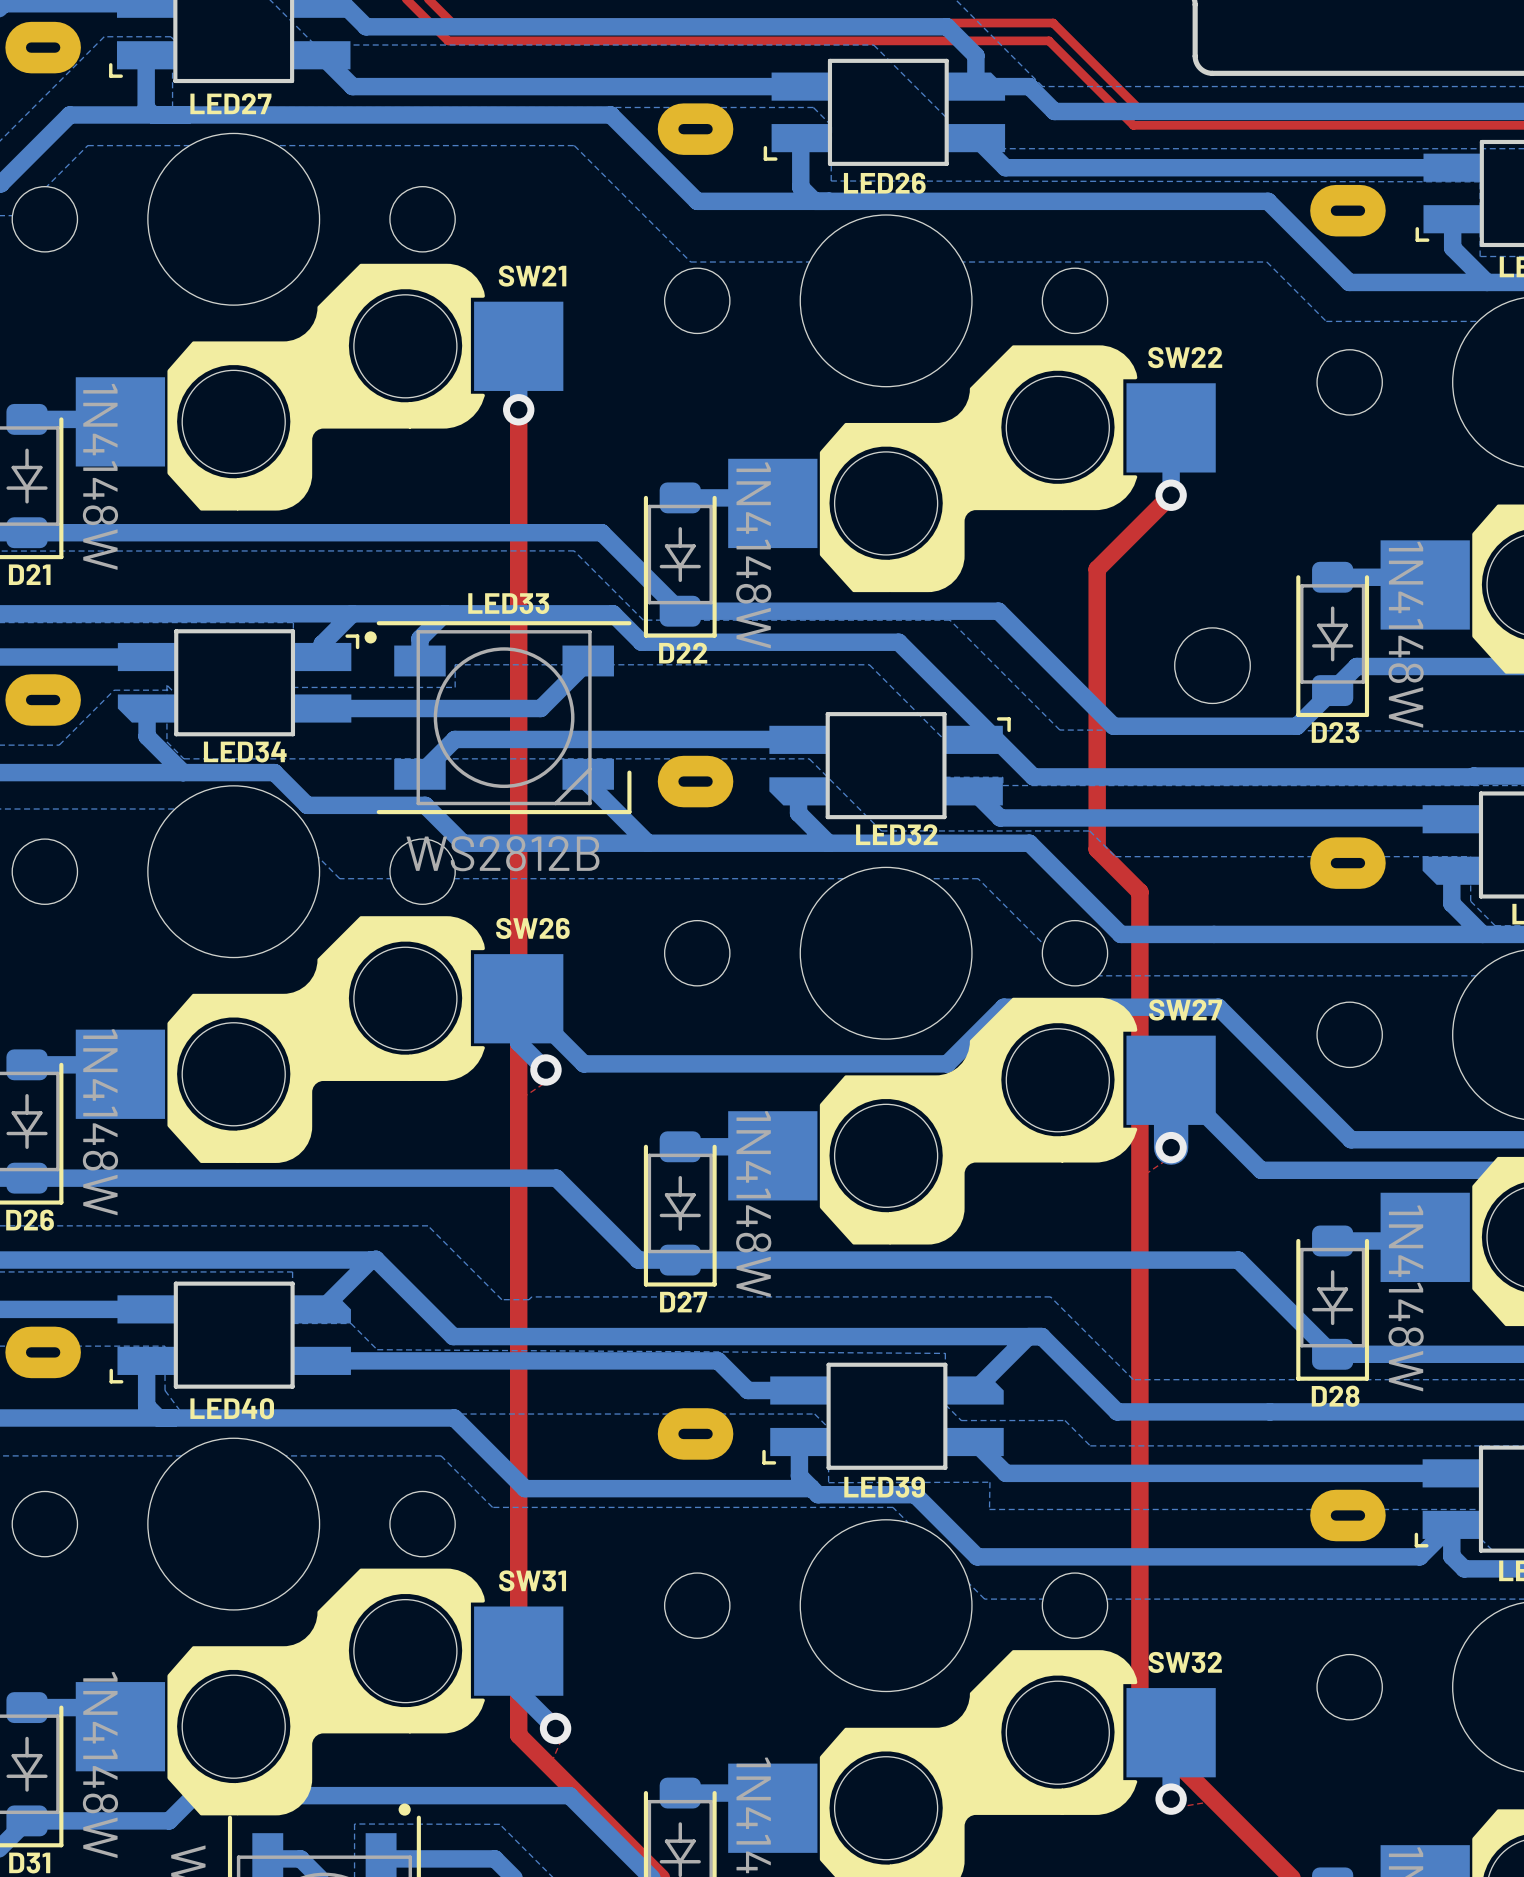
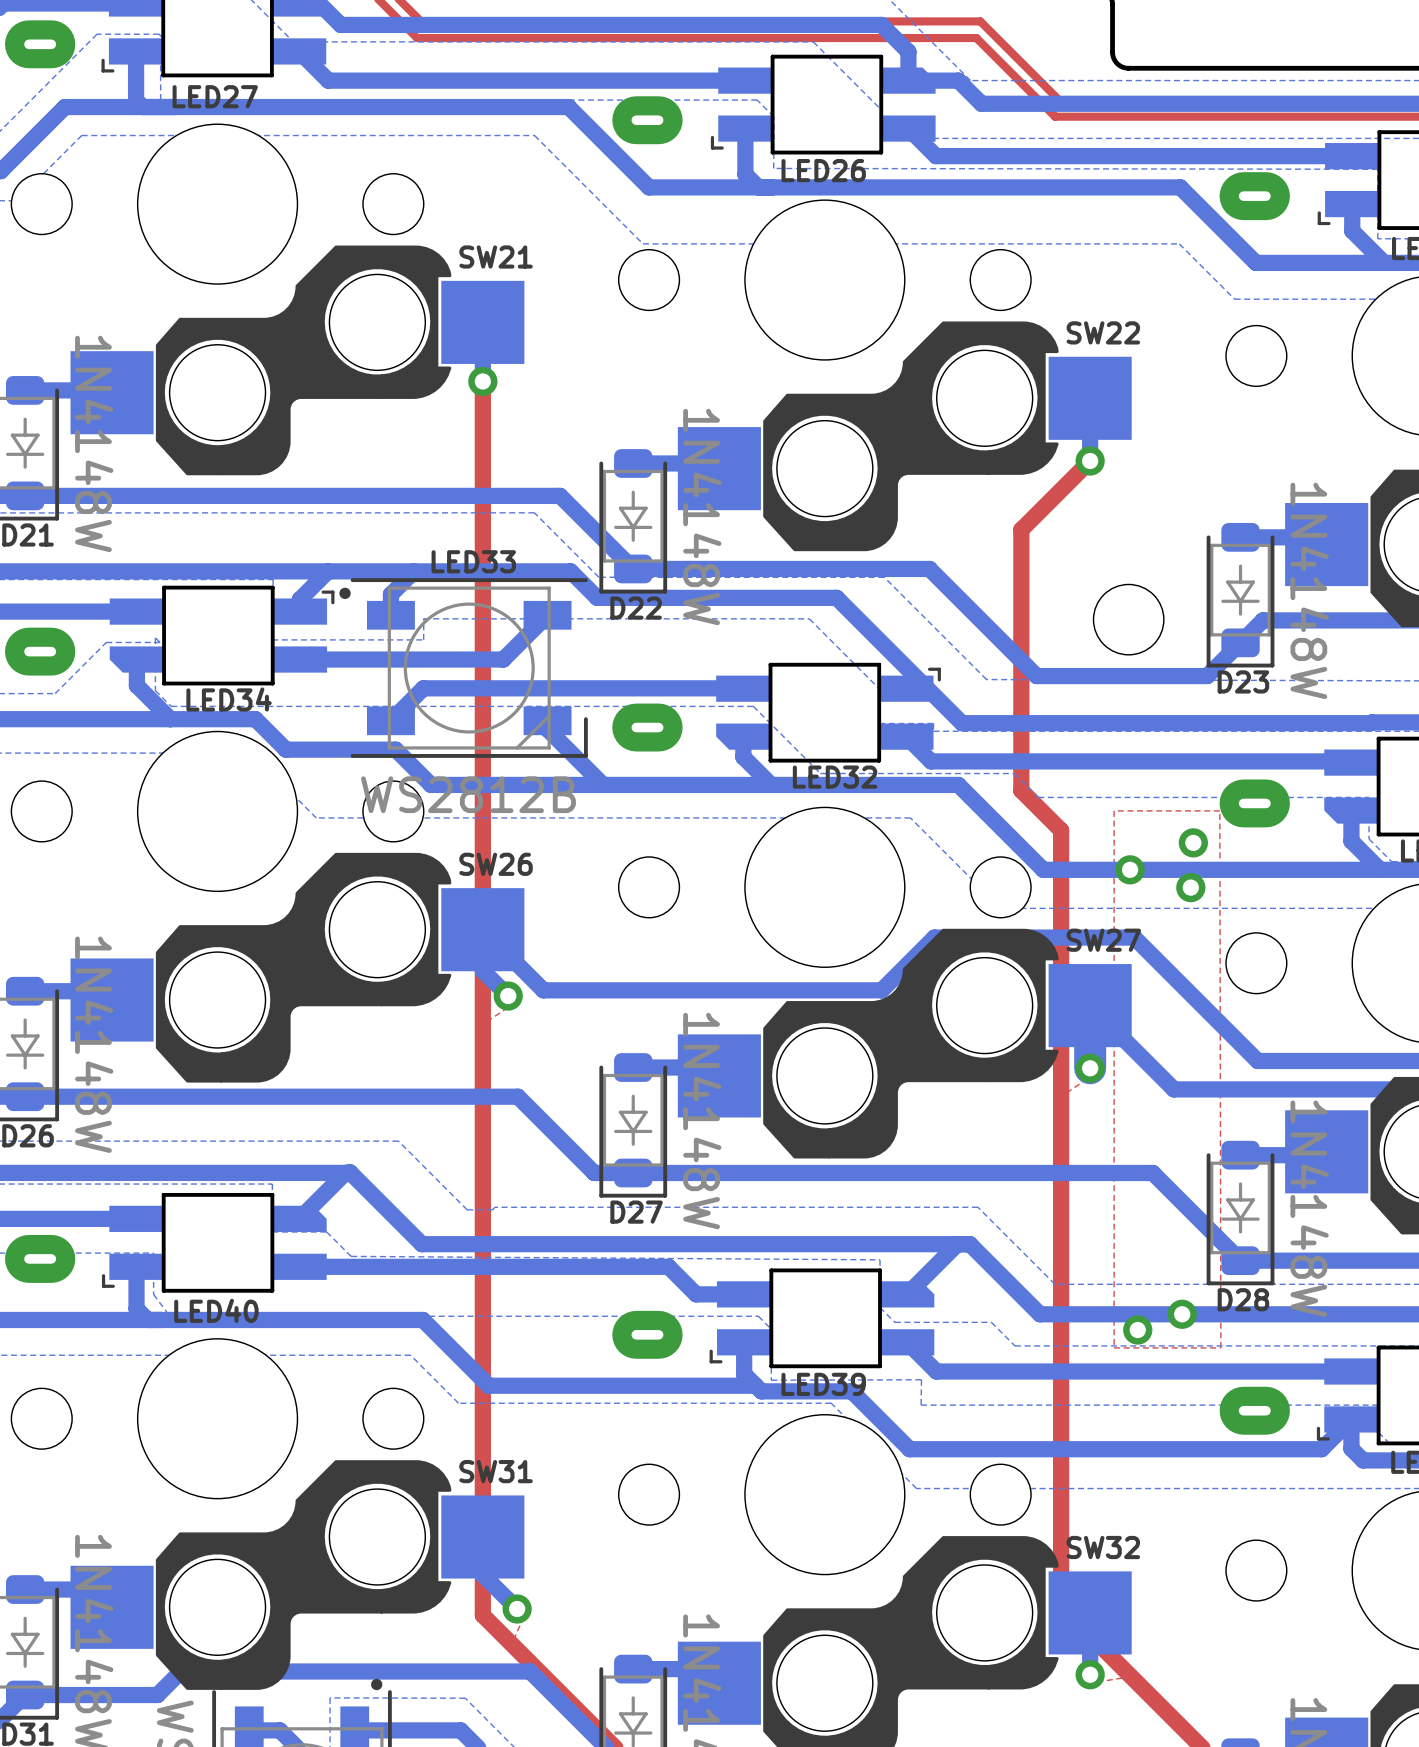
top zone outline: none -> (1219, 810) (1220, 1347) (1114, 1347) (1114, 810) (1219, 810)
via: none -> (1193, 842)
via: none -> (1130, 869)
via: none -> (1190, 887)
via: none -> (1182, 1314)
via: none -> (1137, 1330)

